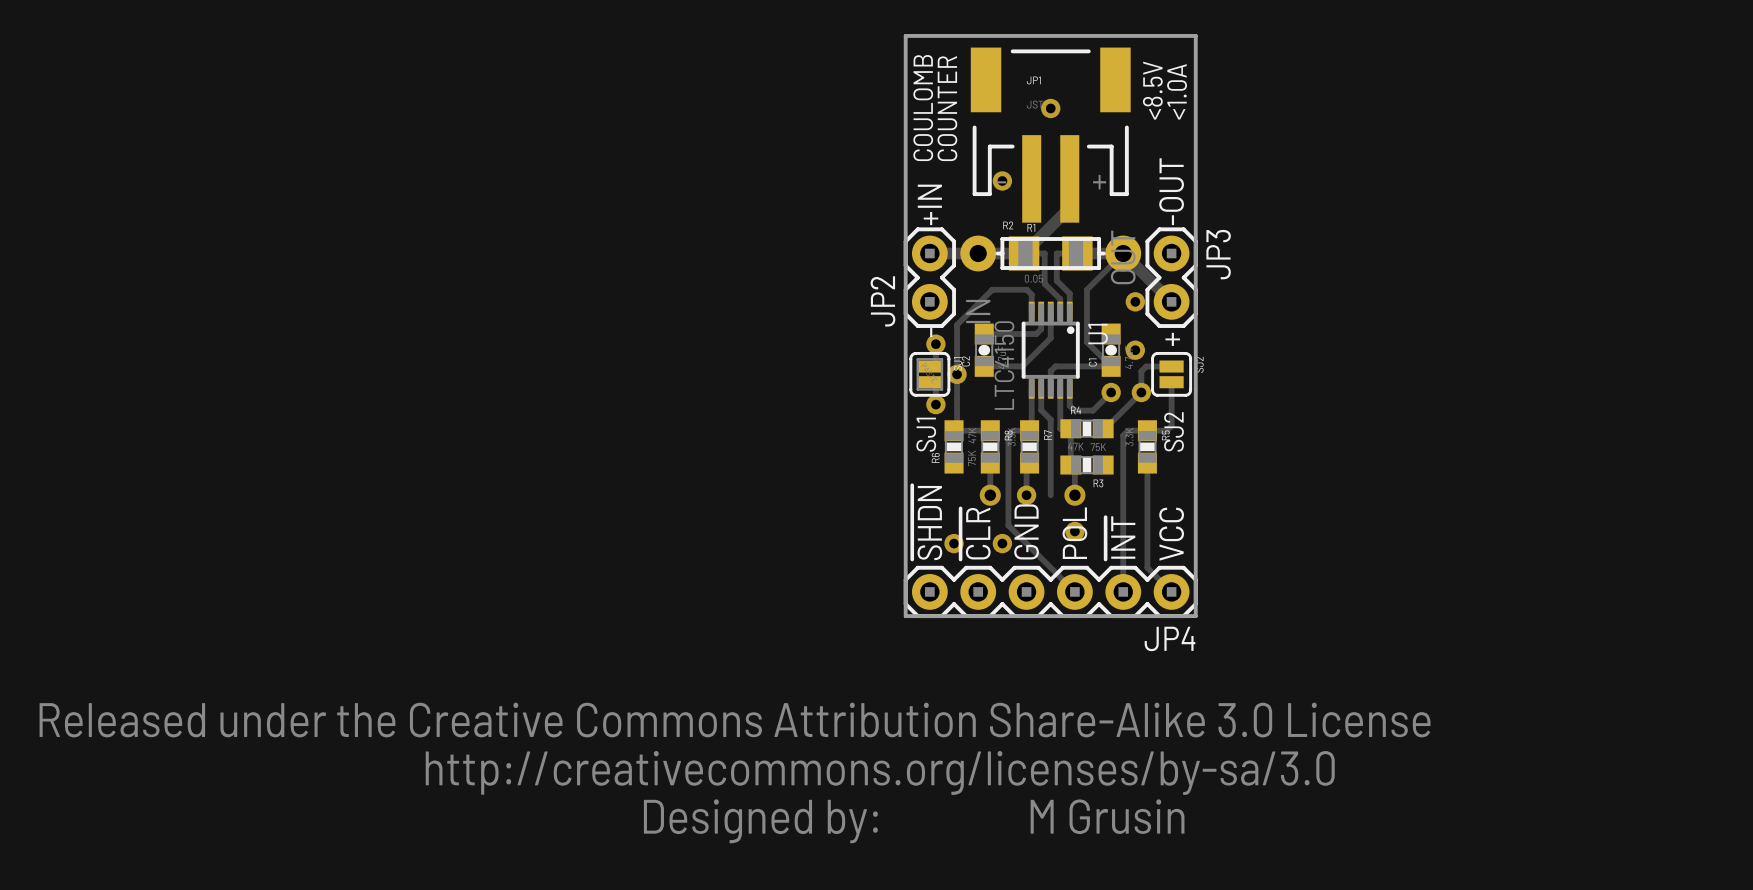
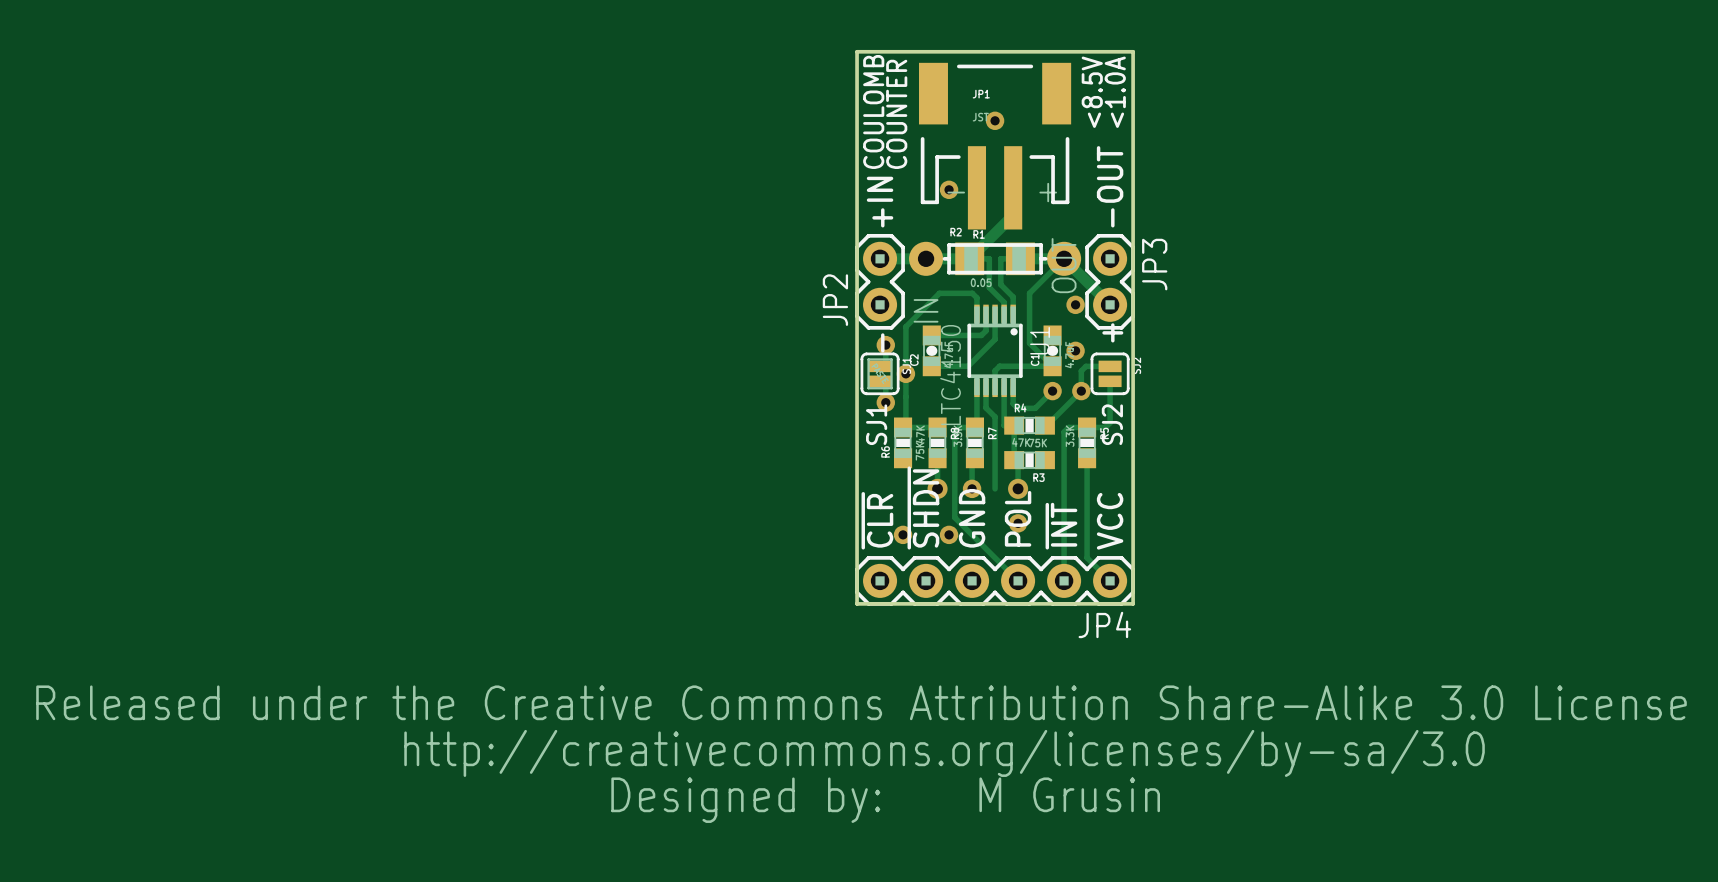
text: ~{SHDN} (927, 522) -> ~{CLR} (877, 520)
text: ~{CLR} (975, 533) -> ~{SHDN} (923, 507)

